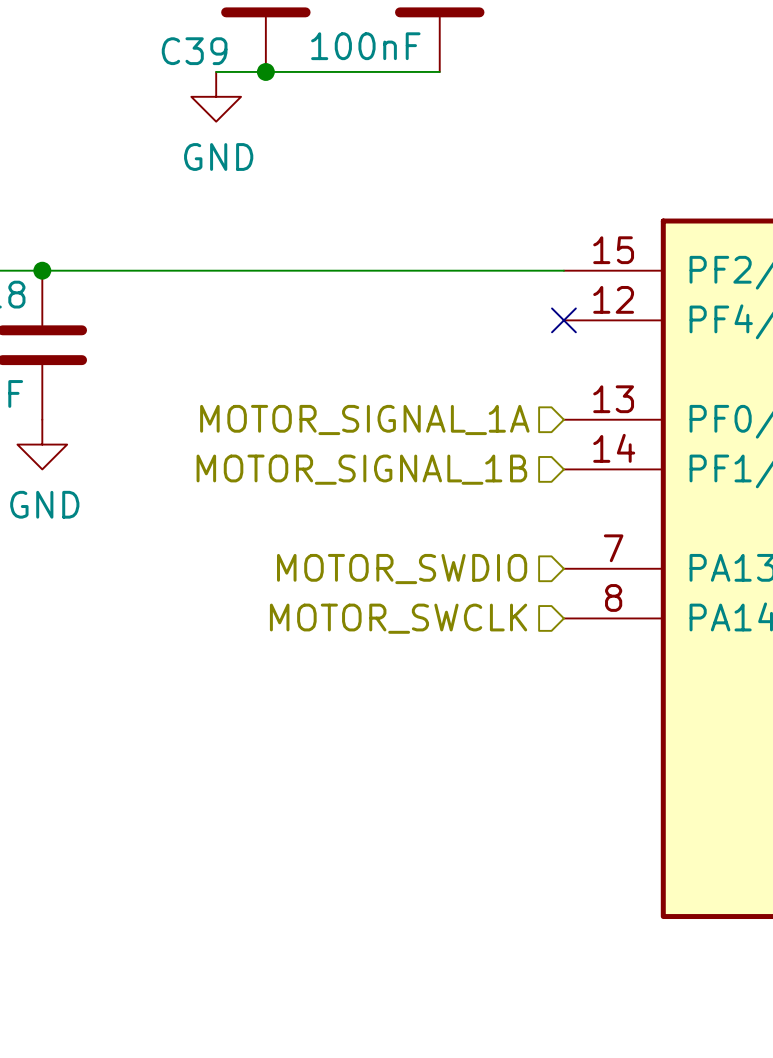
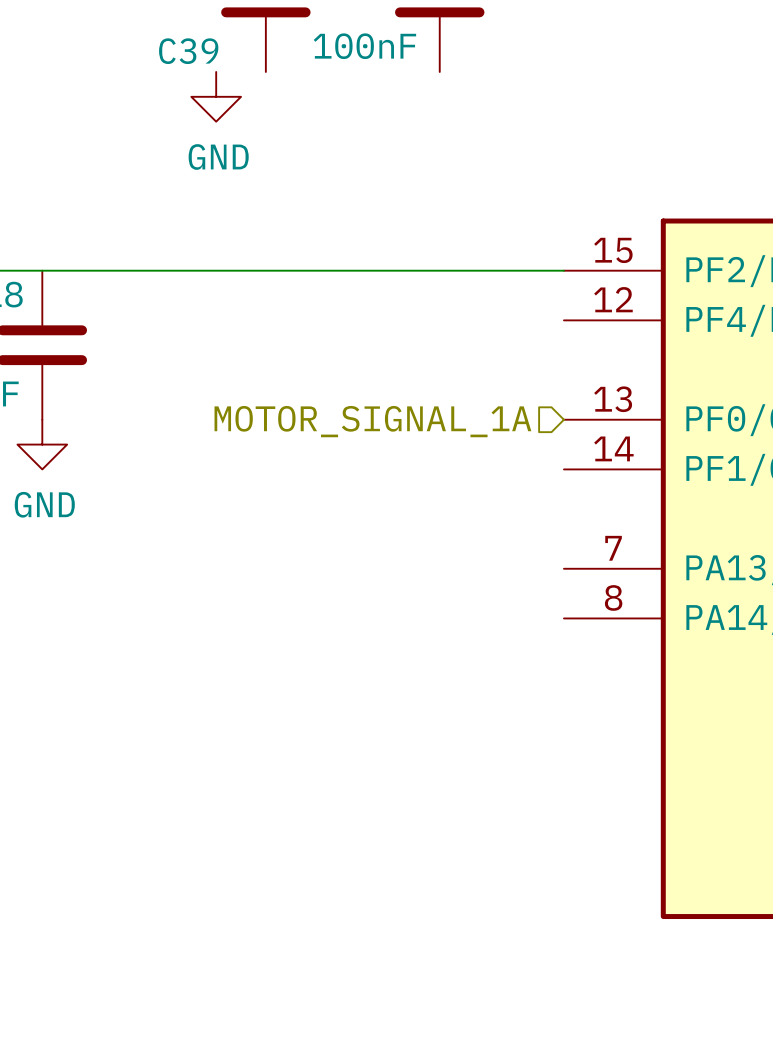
wire: (216, 71) (439, 71) -> none
junction: (265, 71) -> none
junction: (42, 270) -> none
no-connect mark: (563, 320) -> none
hierarchical label: MOTOR_SIGNAL_1B (361, 469) -> none
hierarchical label: MOTOR_SWDIO (402, 569) -> none
hierarchical label: MOTOR_SWCLK (398, 618) -> none

